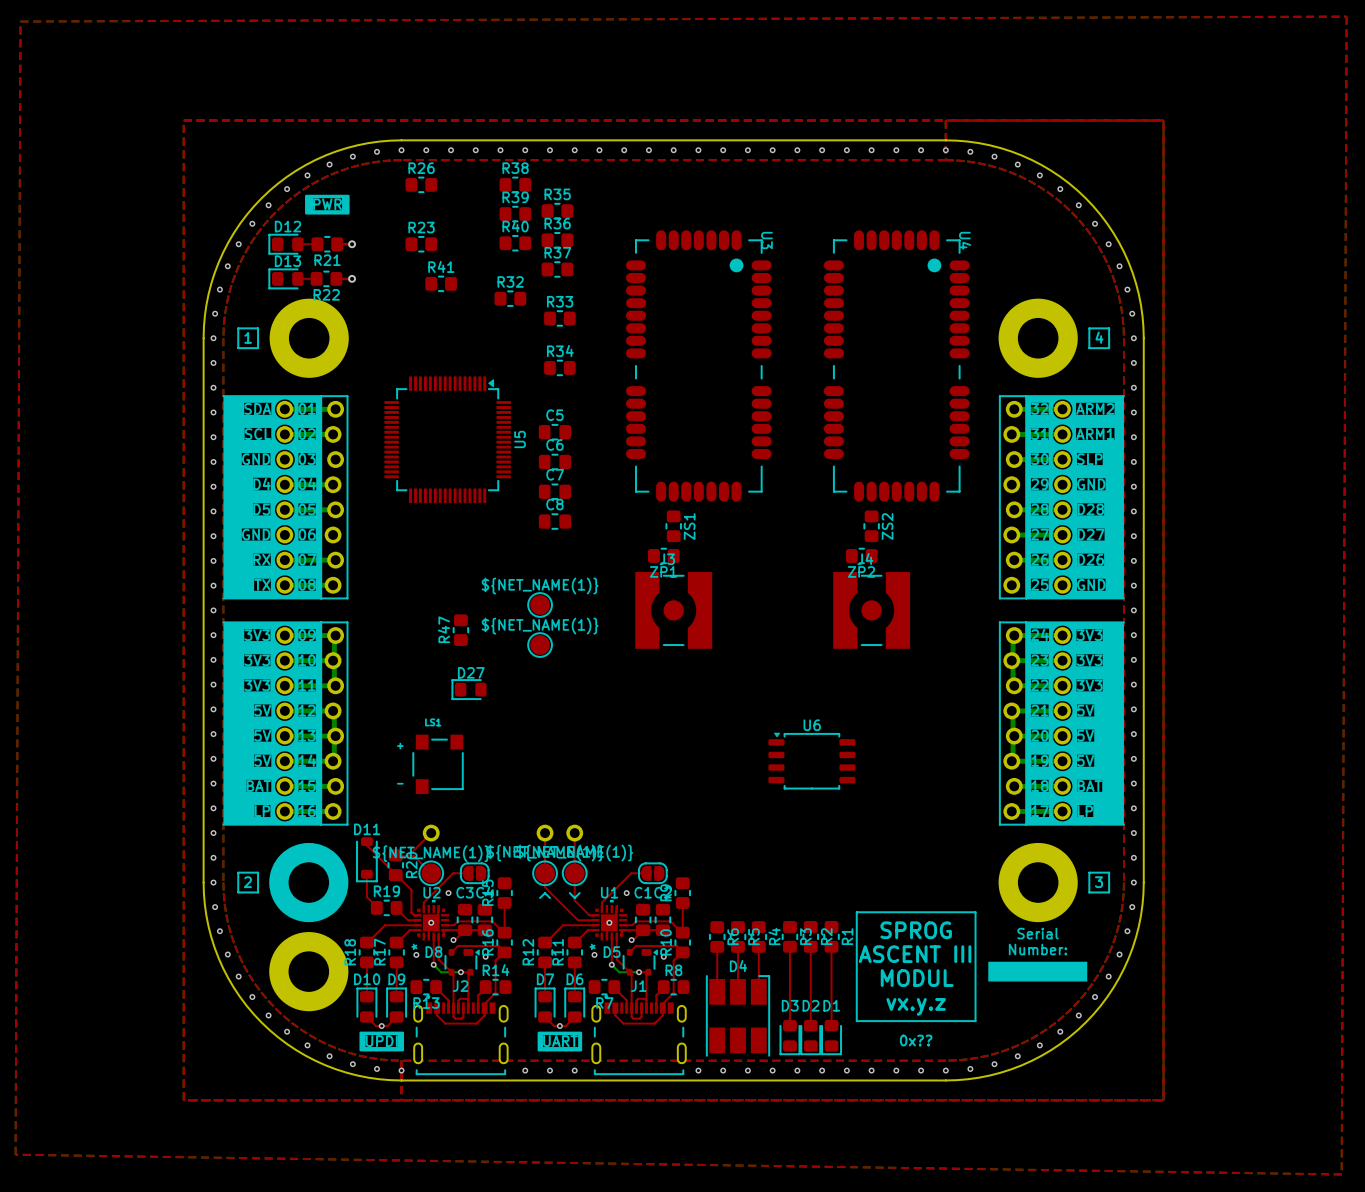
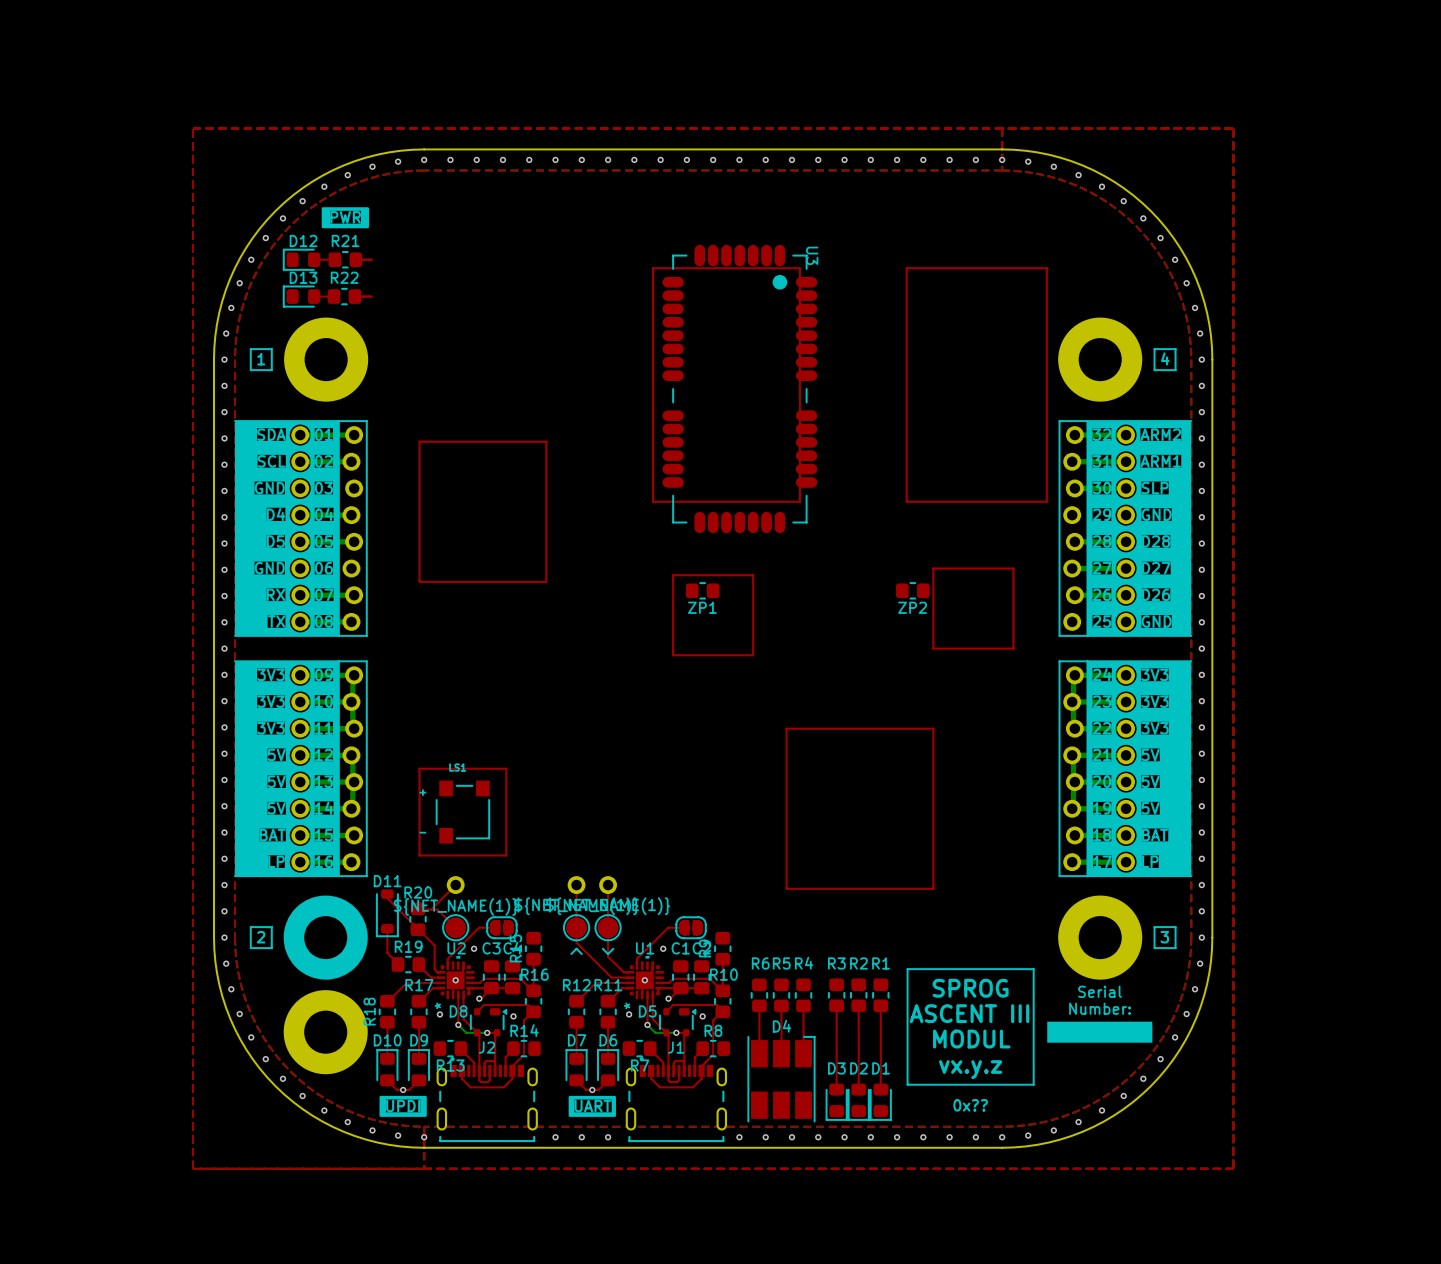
top zone outline: (1346, 16) (20, 21) (15, 1154) (1341, 1174) (1346, 16) -> none
R26: (421, 184) -> none
R38: (515, 184) -> none
R35: (557, 211) -> none
R39: (515, 214) -> none
R36: (557, 240) -> none
R40: (515, 243) -> none
via: (352, 244) -> none
R23: (421, 244) -> none
top track: none -> (653, 268) (799, 268) (799, 501) (653, 501) (653, 268)
top track: none -> (906, 268) (1046, 268) (1046, 501) (906, 501) (906, 268)
R21 name position: R21 (327, 260) -> R21 (345, 240)
R37: (557, 269) -> none
via: (352, 278) -> none
R41: (441, 283) -> none
R22 name position: R22 (326, 294) -> R22 (344, 277)
R32: (510, 298) -> none
R33: (559, 318) -> none
U4: (896, 365) -> none
R34: (559, 367) -> none
top track: none -> (419, 441) (419, 581) (546, 581) (546, 441) (419, 441)
C5: (554, 432) -> none
U5: (447, 439) -> none
C6: (554, 461) -> none
C7: (554, 491) -> none
C8: (554, 521) -> none
ZS1: (673, 526) -> none
ZS2: (871, 526) -> none
top track: none -> (933, 568) (1013, 568) (1013, 648) (933, 648) (933, 568)
top track: none -> (673, 575) (753, 575) (753, 655) (673, 655) (673, 575)
part: (540, 604) -> none
J3: (673, 610) -> none
J4: (871, 610) -> none
R47: (460, 630) -> none
part: (540, 645) -> none
top track: none -> (786, 728) (933, 728) (933, 888) (786, 888) (786, 728)
D27: (469, 689) -> none
top track: none -> (419, 768) (506, 768) (506, 855) (419, 855) (419, 768)
U6: (811, 760) -> none
R20 name rotation: 0° (411, 864) -> 90° clockwise (418, 892)
R6 name rotation: 0° (733, 936) -> 90° clockwise (760, 963)
R6 name position: R6 (733, 936) -> R6 (760, 963)
R5 name rotation: 0° (753, 936) -> 90° clockwise (781, 963)
R5 name position: R5 (753, 936) -> R5 (781, 963)
R4 name rotation: 0° (774, 936) -> 90° clockwise (804, 963)
R4 name position: R4 (774, 936) -> R4 (804, 963)
R3 name rotation: 0° (805, 936) -> 90° clockwise (836, 963)
R3 name position: R3 (805, 936) -> R3 (836, 963)
R2 name rotation: 0° (826, 936) -> 90° clockwise (858, 963)
R2 name position: R2 (826, 936) -> R2 (858, 963)
R1 name rotation: 0° (847, 936) -> 90° clockwise (881, 963)
R1 name position: R1 (847, 936) -> R1 (881, 963)
R16 name rotation: 0° (487, 942) -> 90° clockwise (534, 974)
R10 name rotation: 0° (666, 942) -> 90° clockwise (723, 974)
R17 name rotation: 0° (379, 951) -> 90° clockwise (419, 985)
R12 name rotation: 0° (528, 952) -> 90° clockwise (576, 985)
R11 name rotation: 0° (558, 952) -> 90° clockwise (608, 985)

